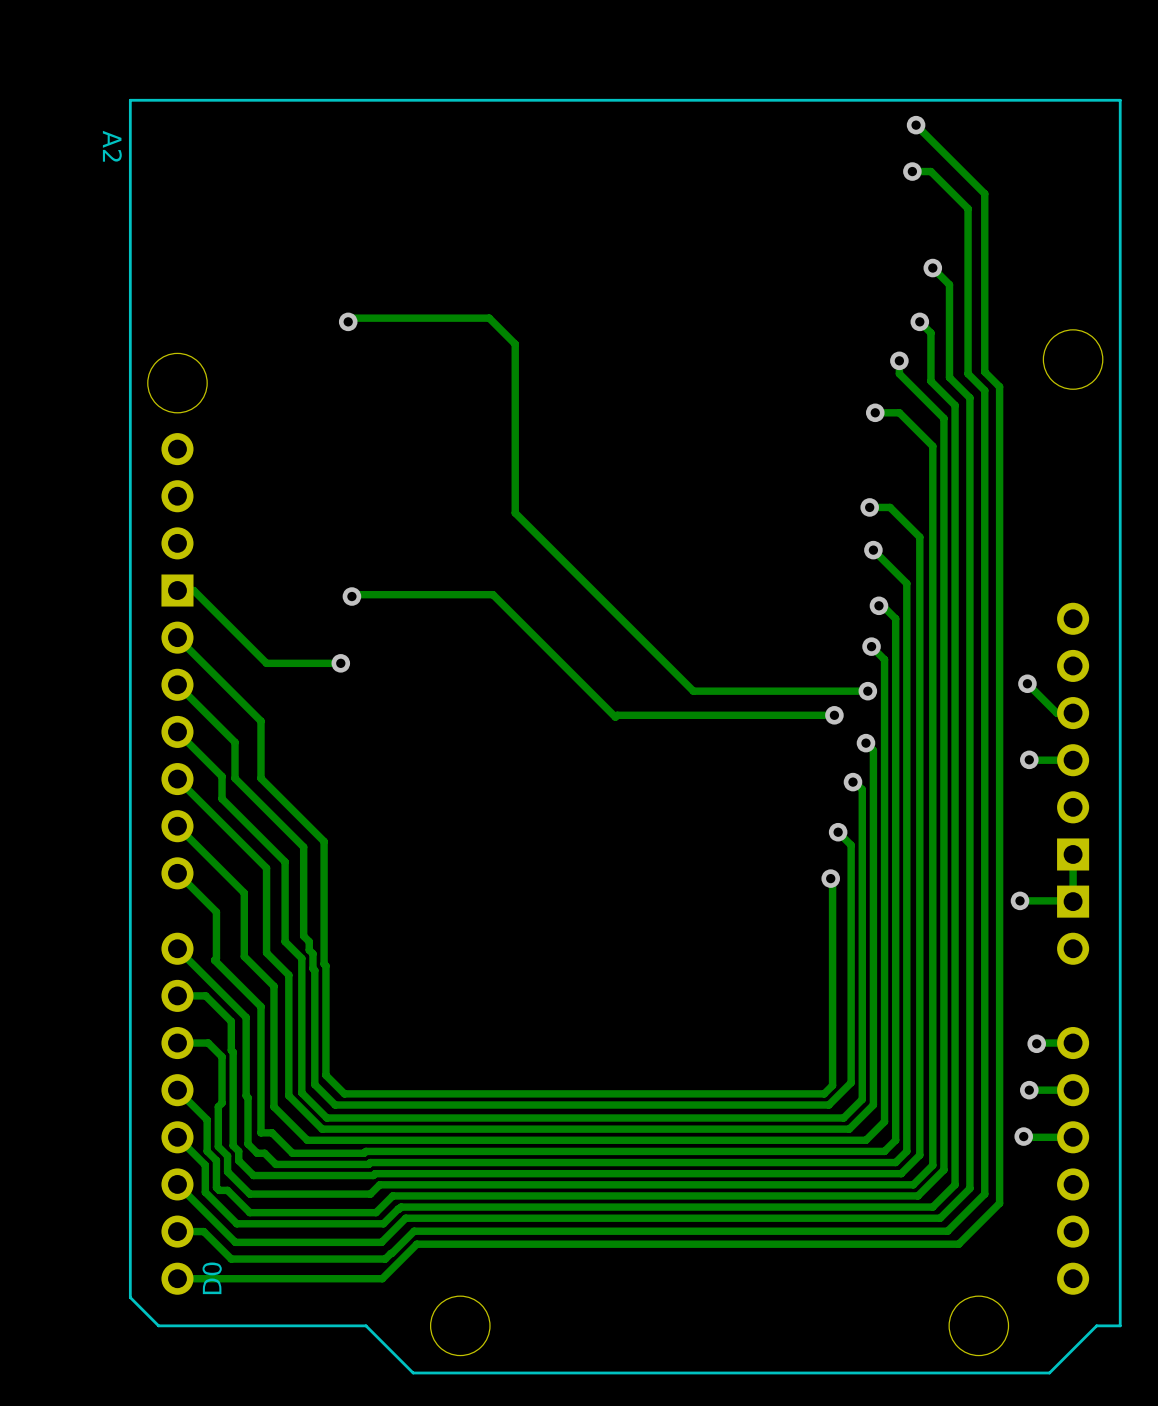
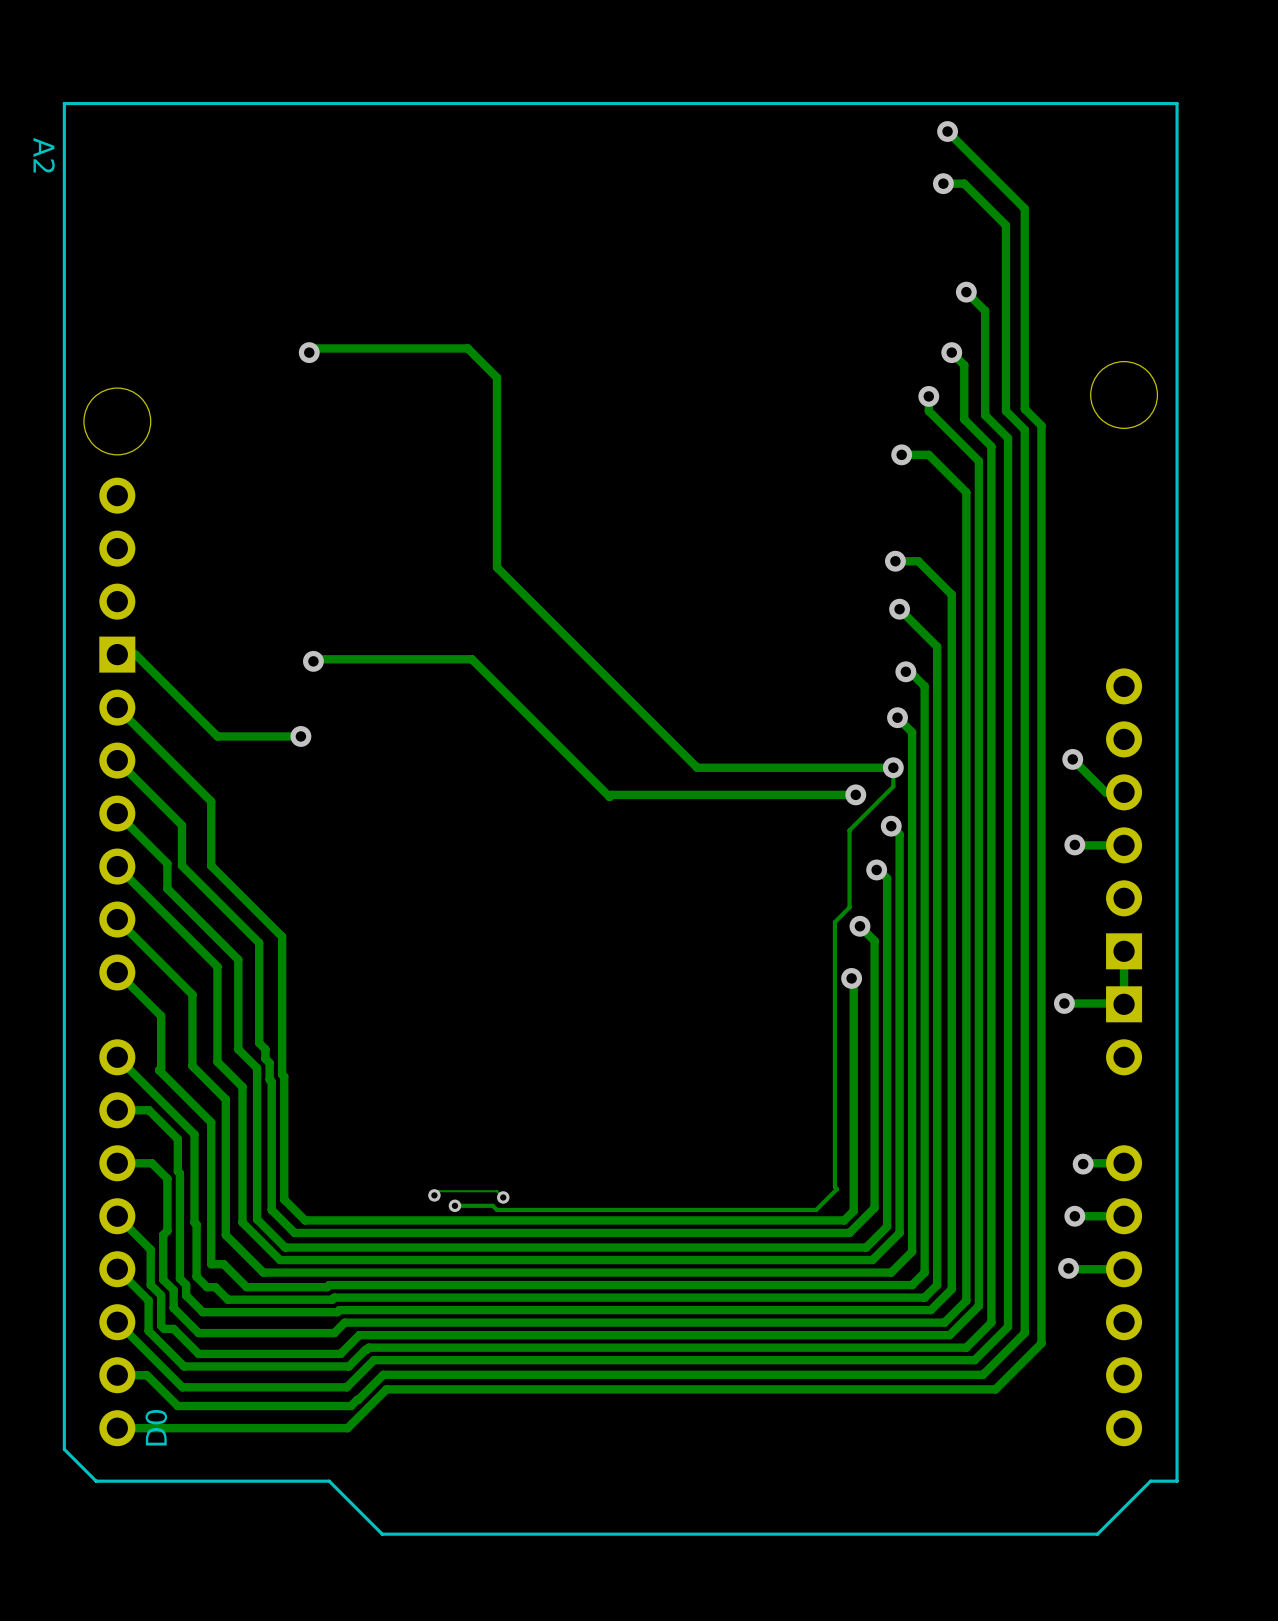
A2 footprint: [128, 98, 1122, 1375] -> [62, 101, 1179, 1536]
track: none -> (893, 767) (893, 786) (849, 830) (849, 907) (834, 922) (834, 1187) (837, 1189) (816, 1209) (496, 1209) (492, 1205) (454, 1205)
track: none -> (434, 1195) (438, 1191) (496, 1191) (503, 1197)
via: none -> (434, 1195)
via: none -> (503, 1197)
via: none -> (454, 1205)

